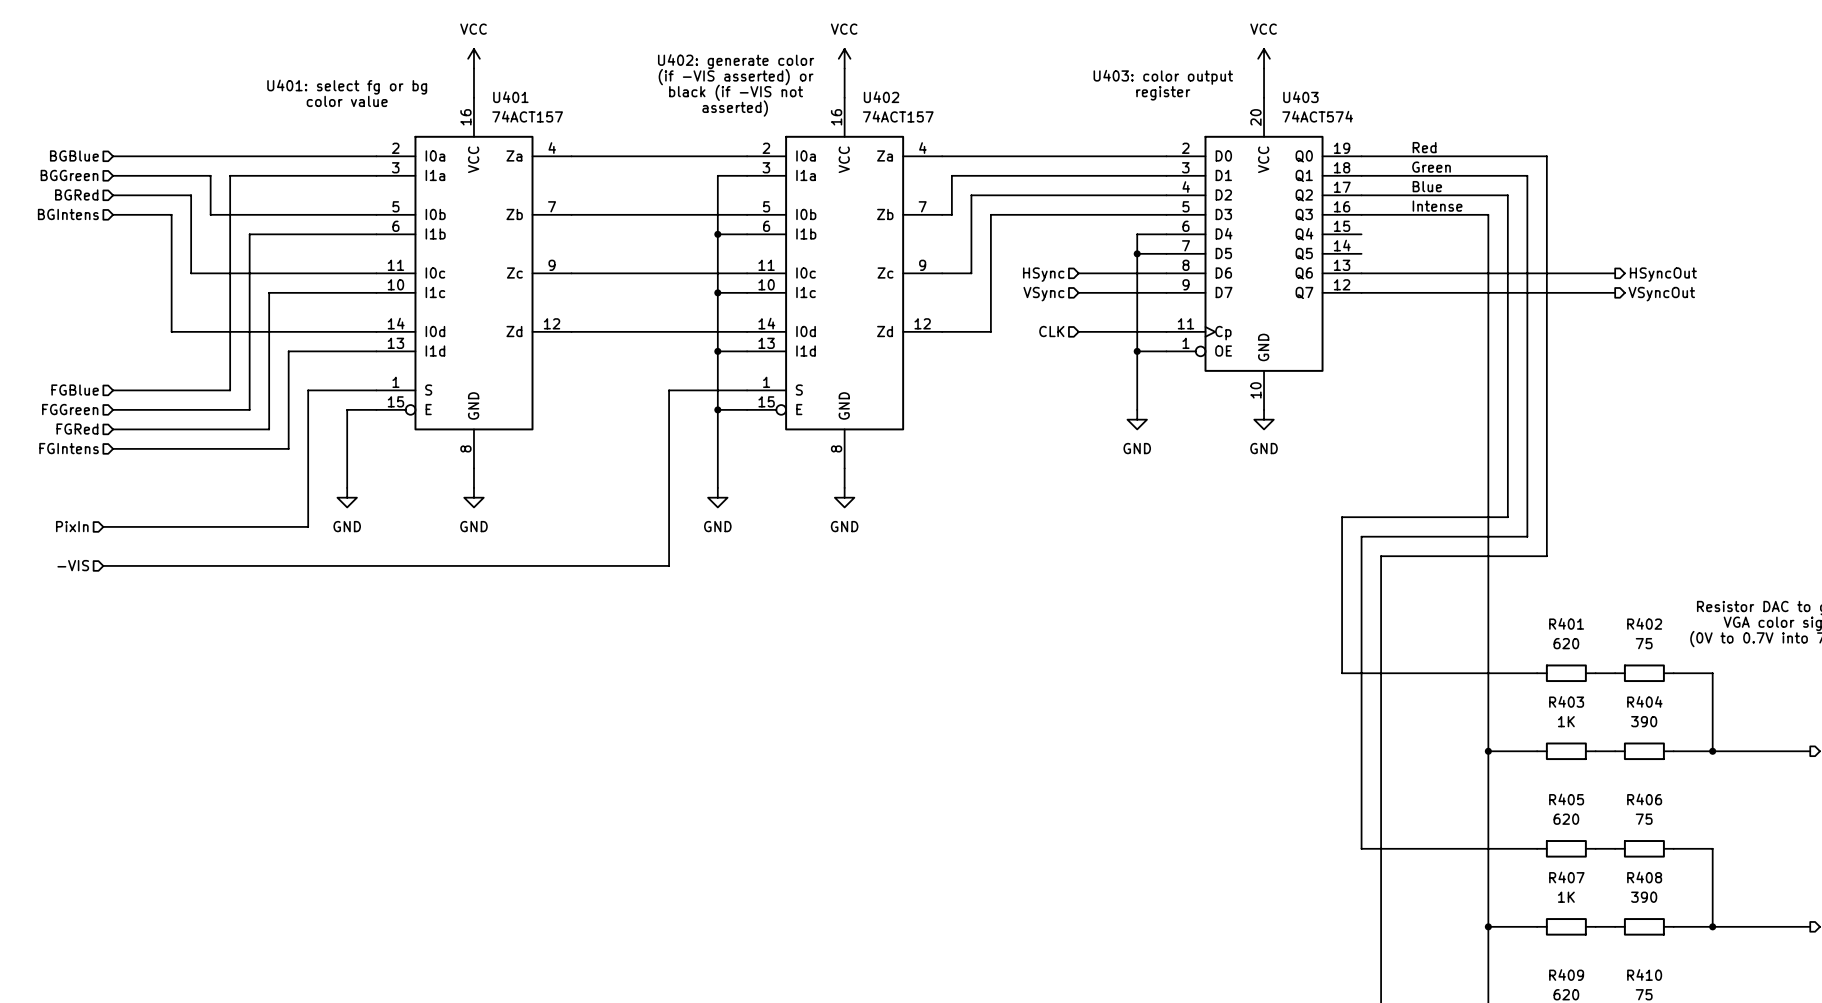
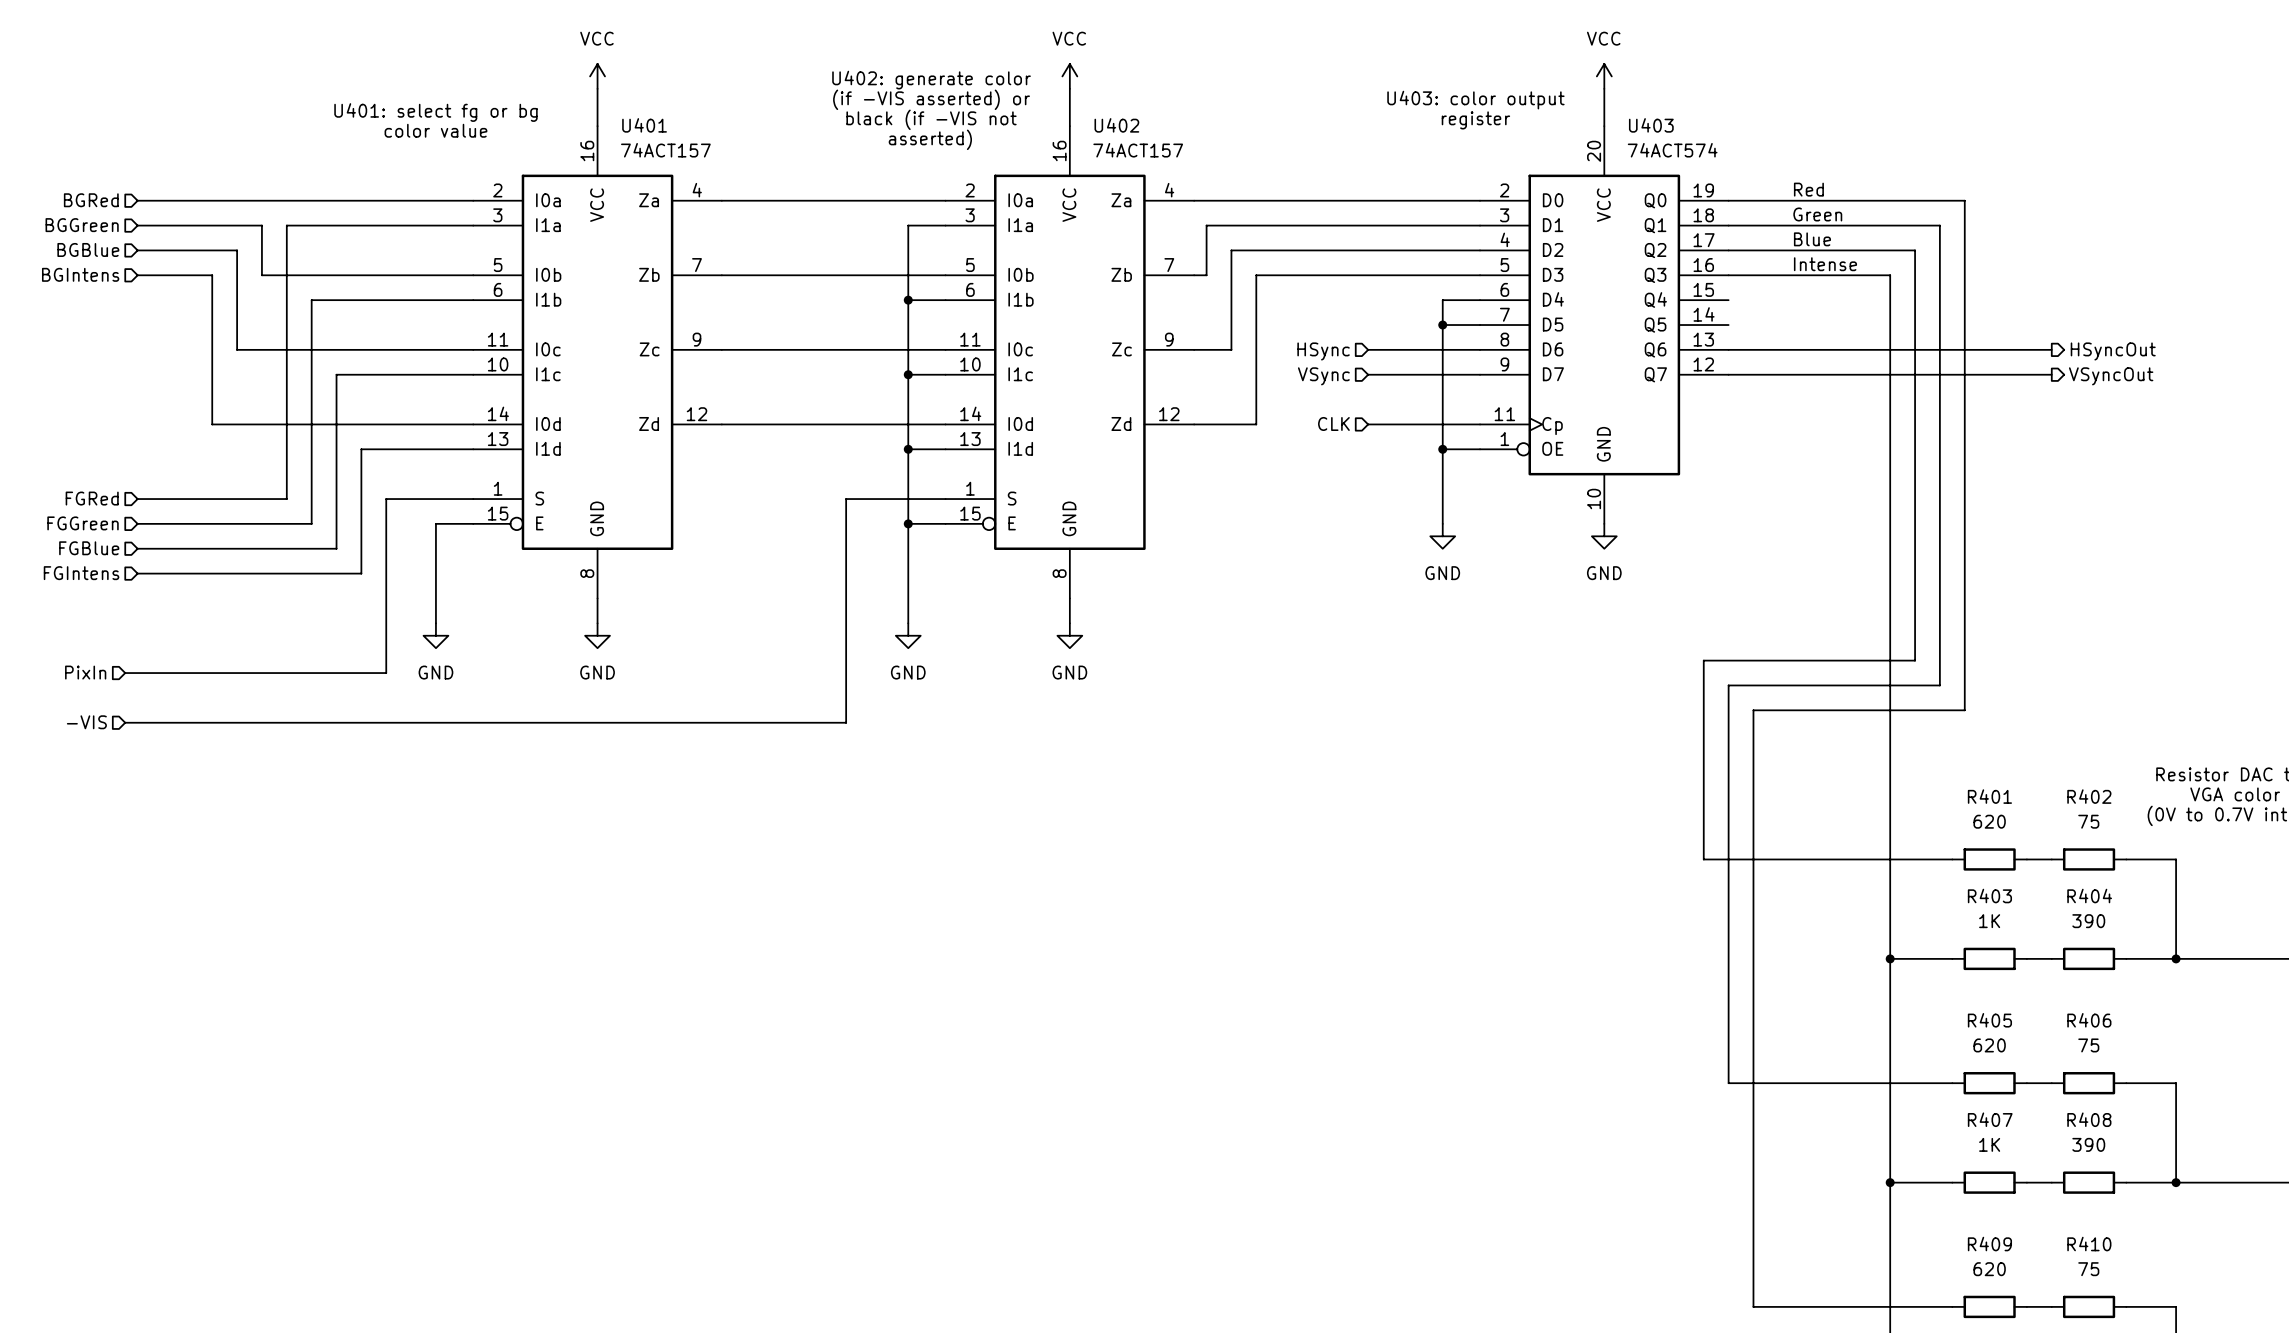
hierarchical label: BGBlue (74, 155) -> BGRed (91, 200)
hierarchical label: BGRed (76, 194) -> BGBlue (88, 249)
hierarchical label: FGBlue (75, 390) -> FGRed (92, 498)
hierarchical label: FGRed (77, 429) -> FGBlue (89, 548)

